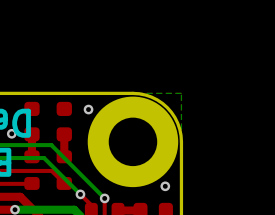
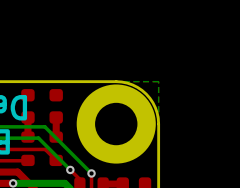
via: (88, 109) -> none
via: (11, 133) -> none
via: (165, 186) -> none

